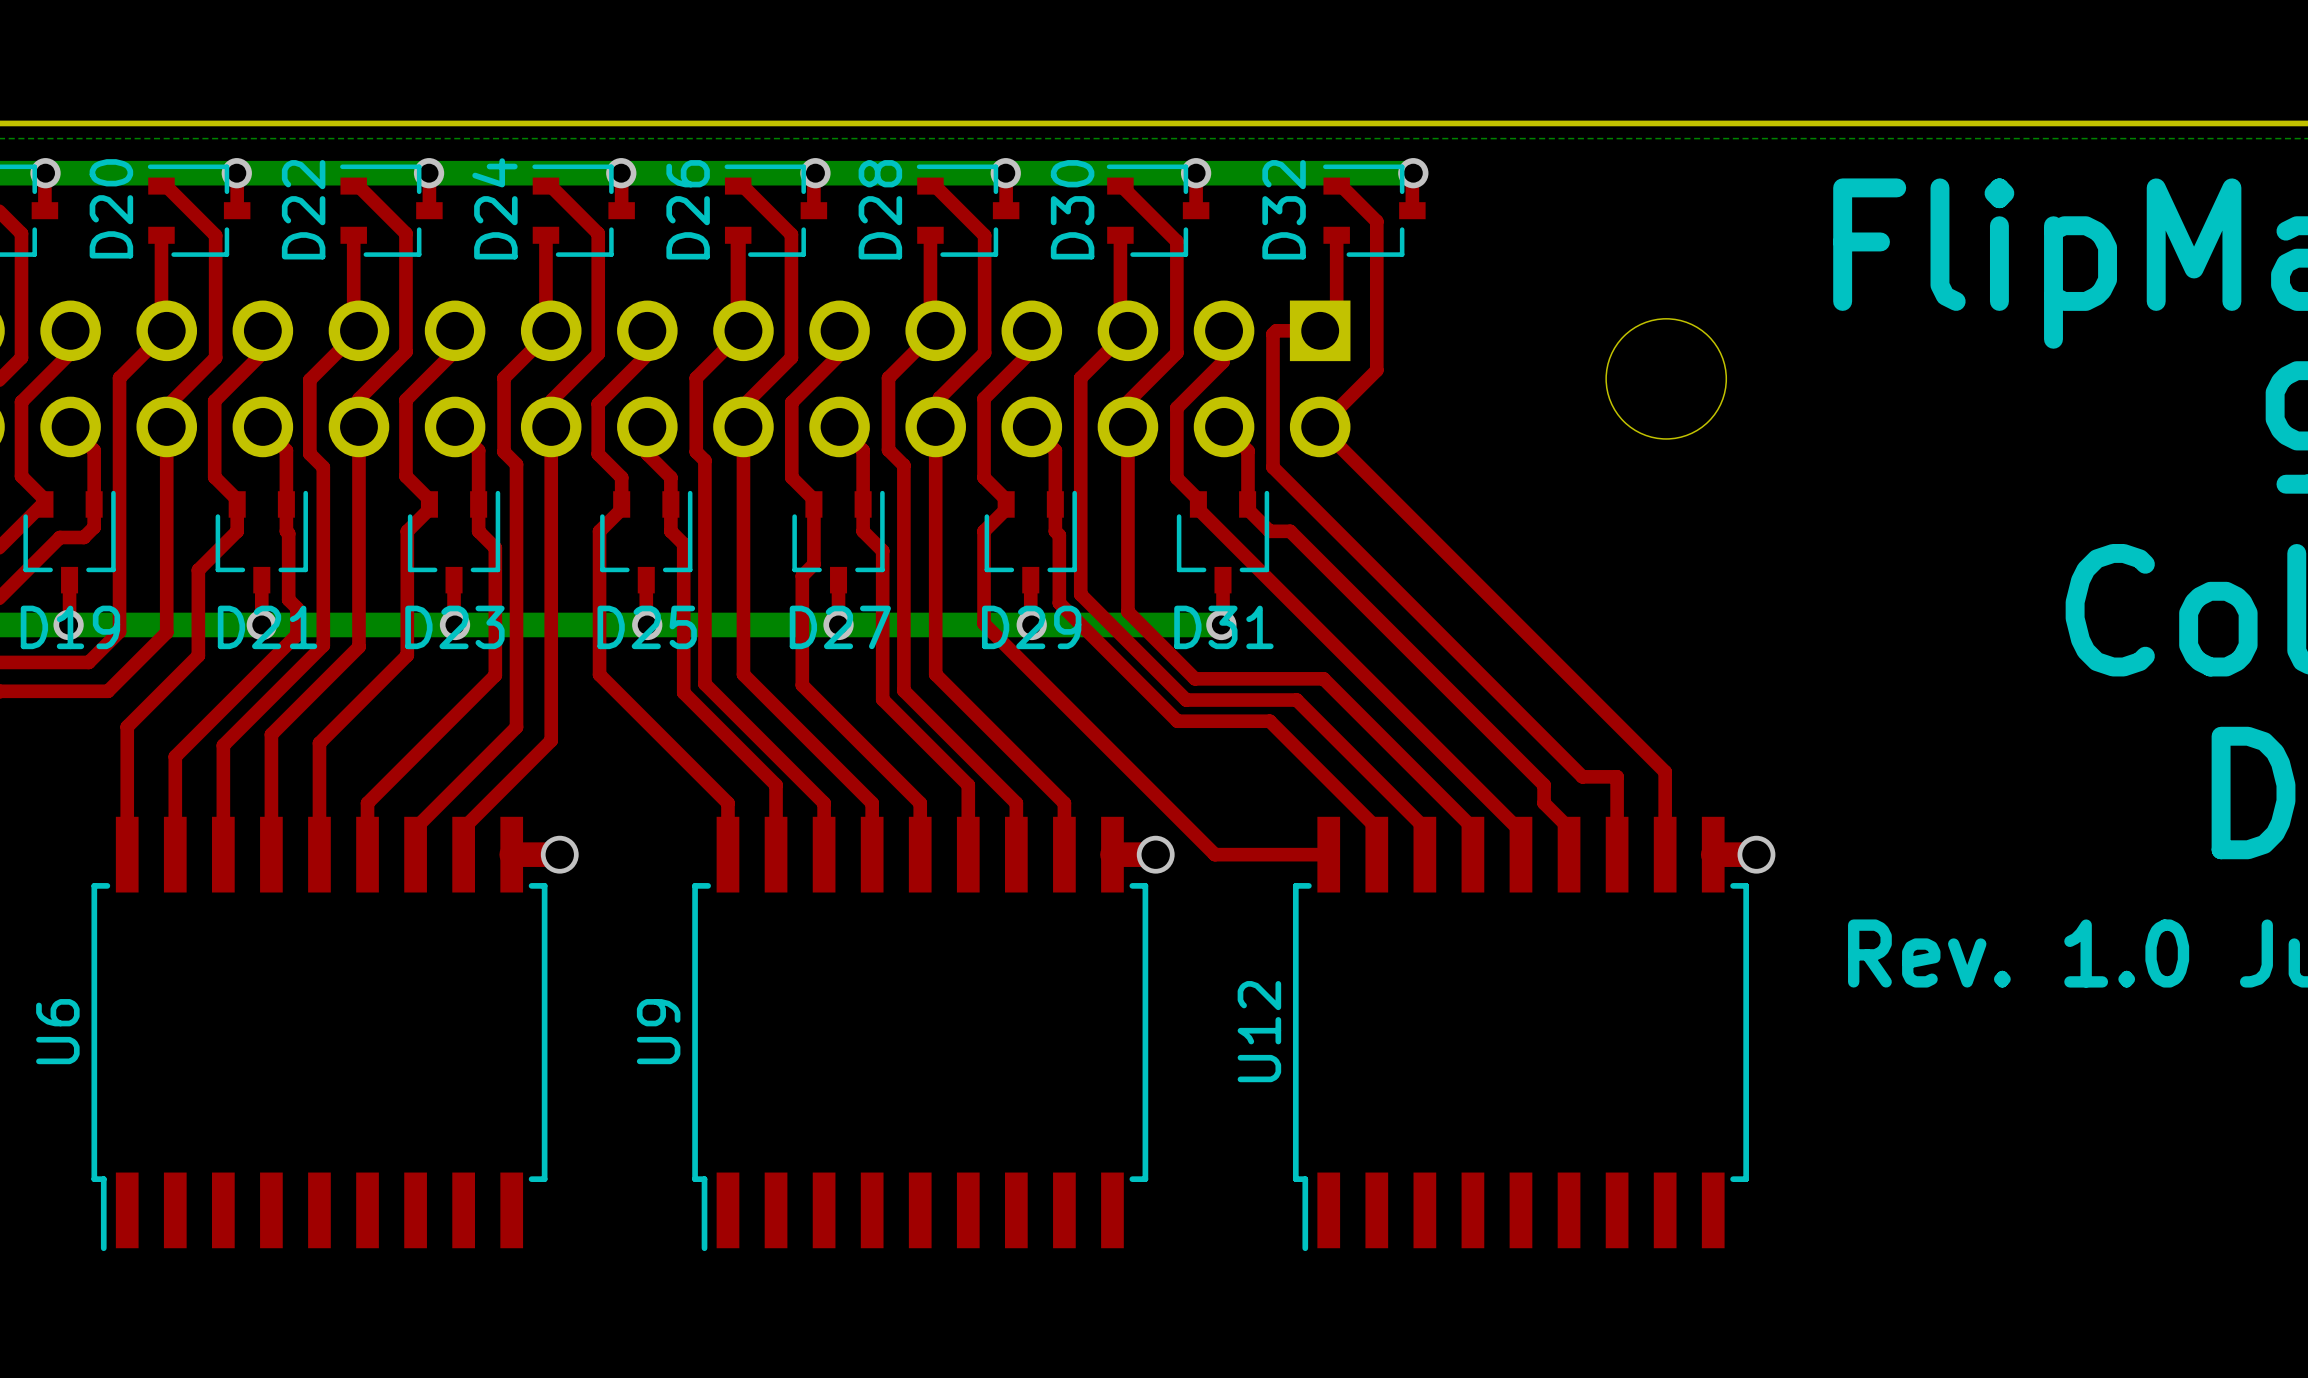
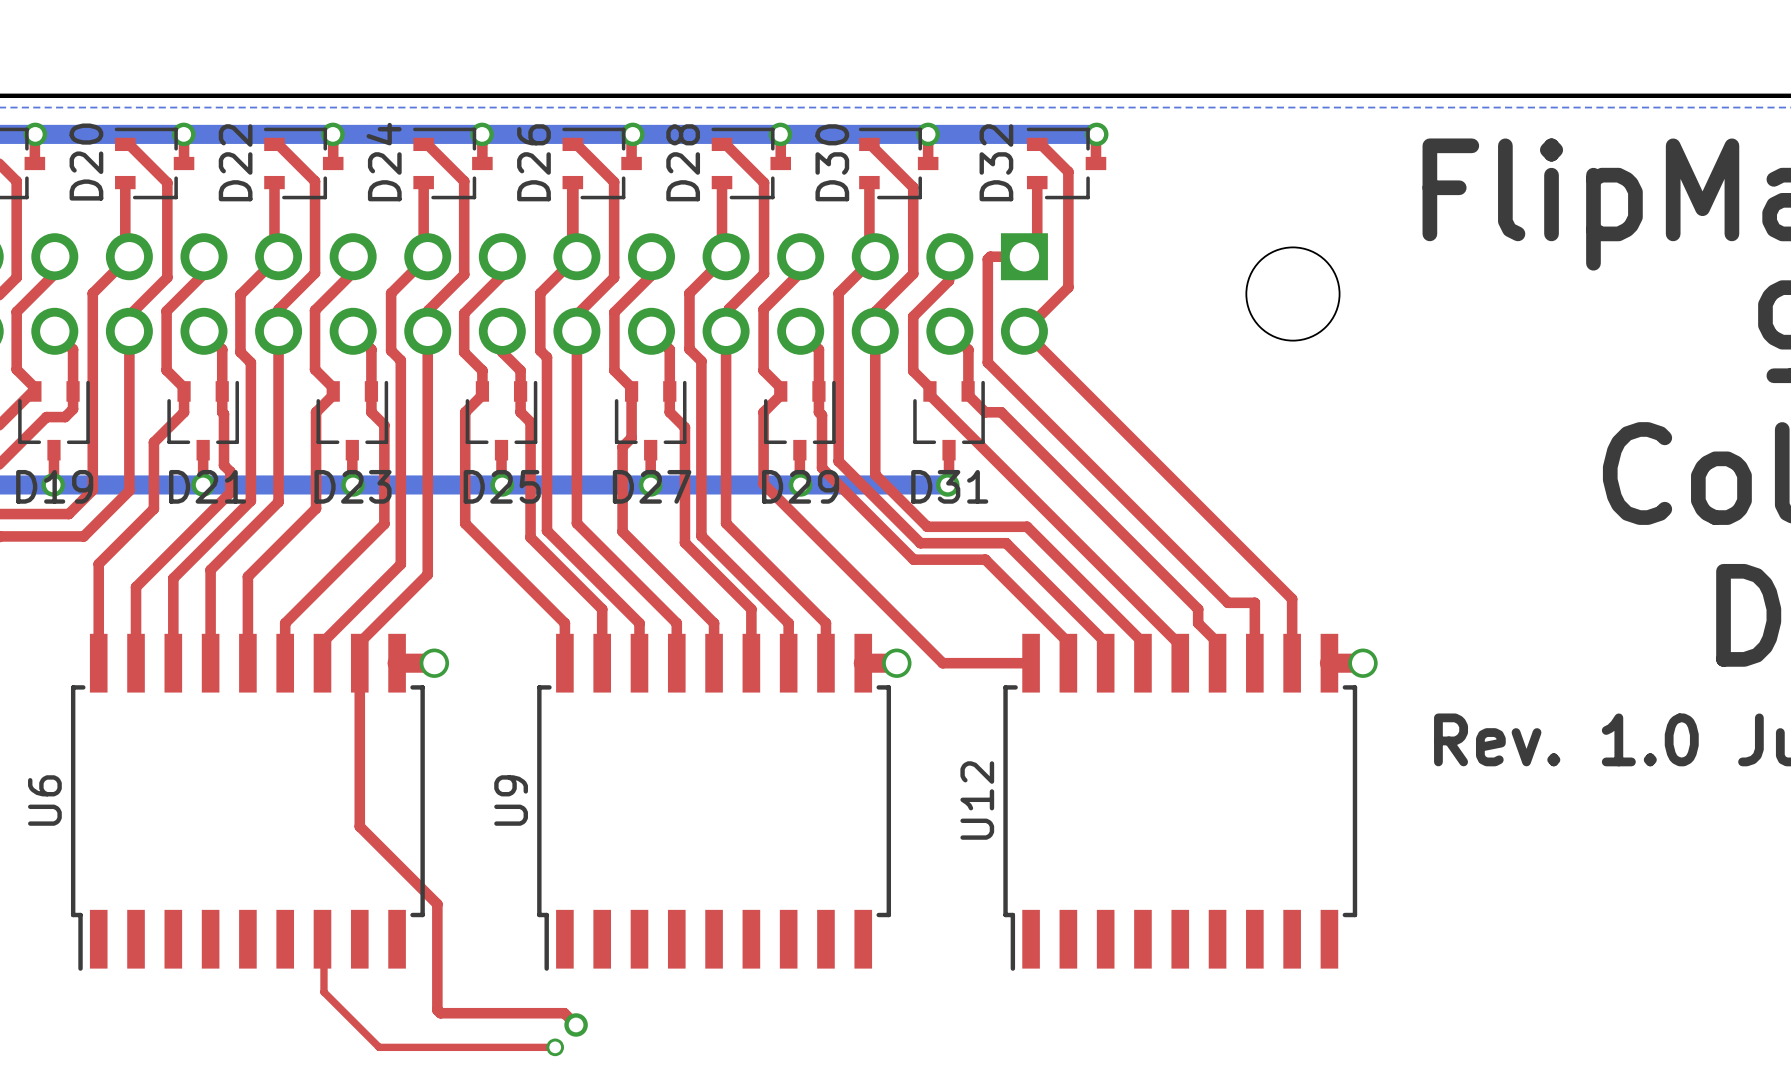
top track: none -> (359, 663) (359, 826) (437, 904) (437, 1010) (440, 1013) (564, 1013) (576, 1024)
top track: none -> (322, 939) (323, 992) (379, 1047) (555, 1047)
via: none -> (576, 1024)
via: none -> (555, 1047)

